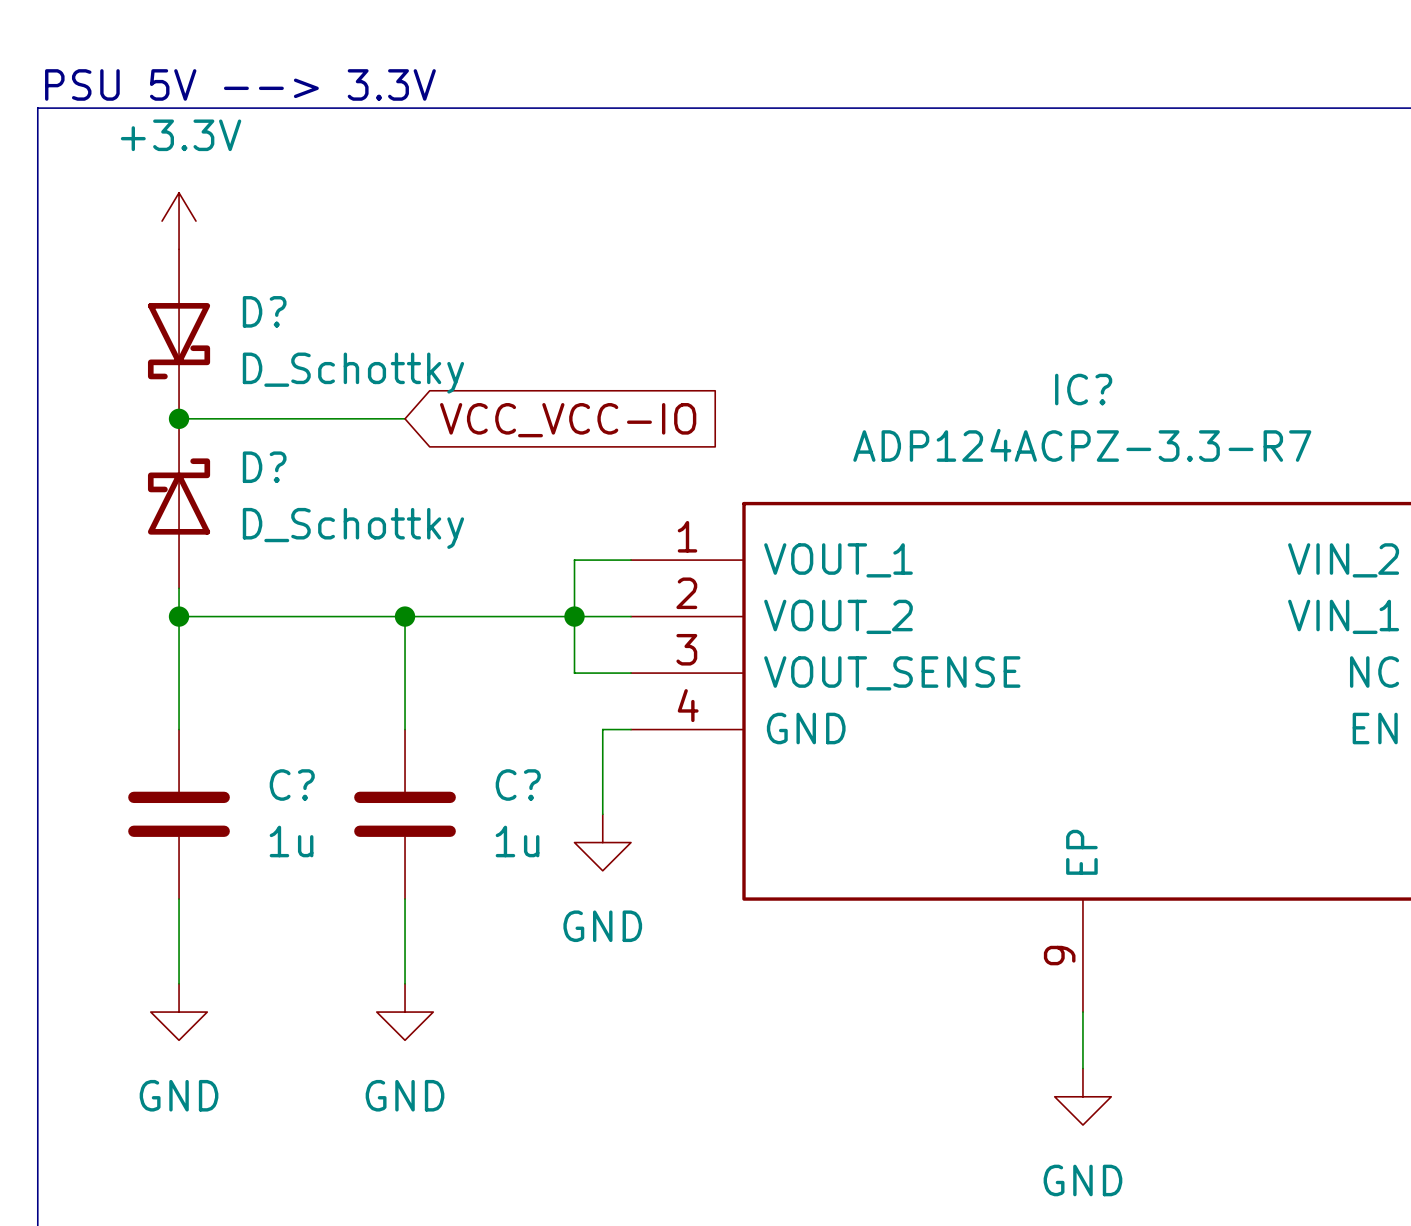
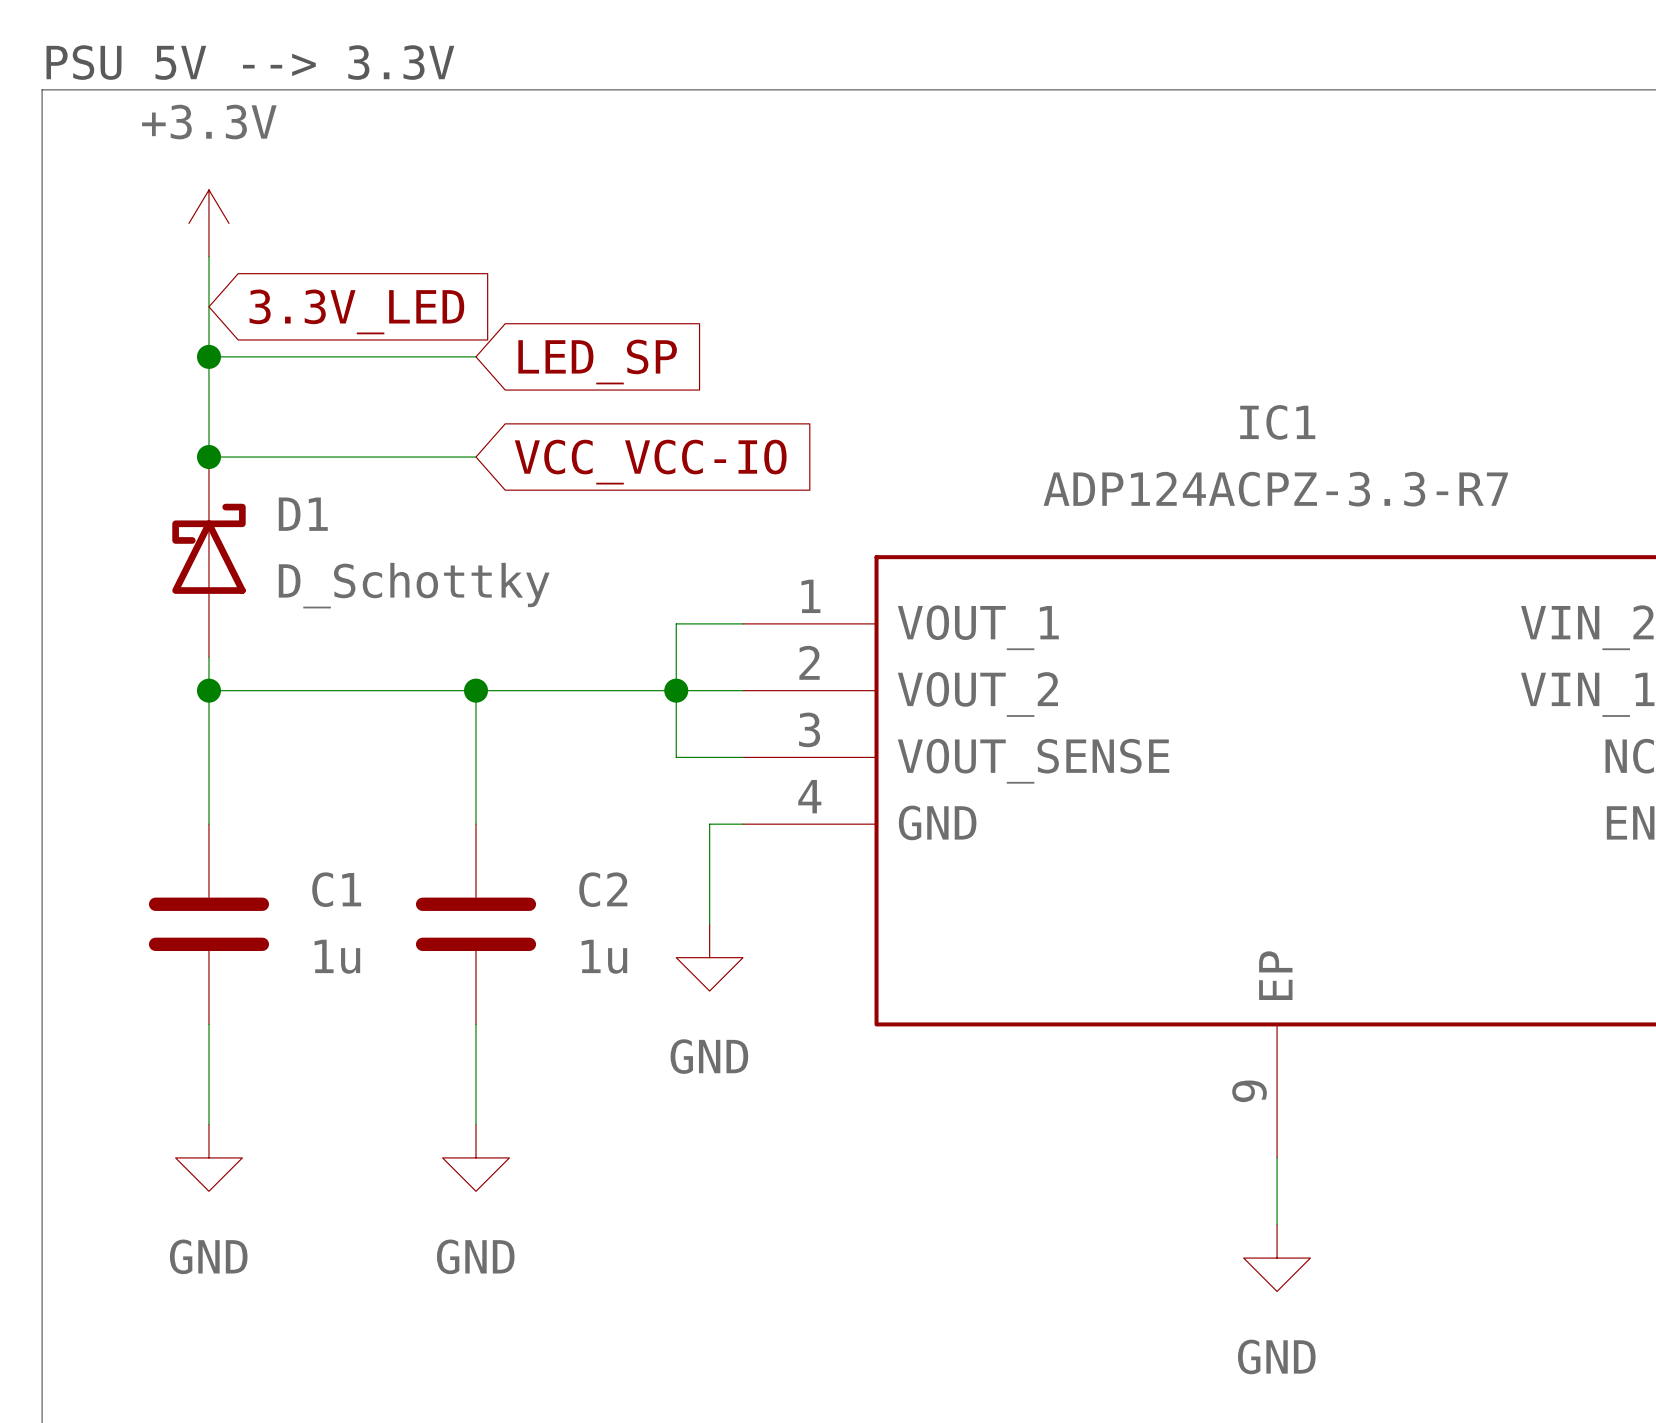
global label: none -> 3.3V_LED (356, 311)
wire: none -> (208, 356) (476, 356)
D?: D_Schottky (179, 334) -> none
junction: none -> (208, 356)
global label: none -> LED_SP (597, 361)
IC? name: IC? (1083, 389) -> IC1 (1277, 422)
D? name: D? (264, 467) -> D1 (303, 514)
C? name: C? (292, 785) -> C1 (336, 889)
C? name: C? (518, 785) -> C2 (603, 889)

